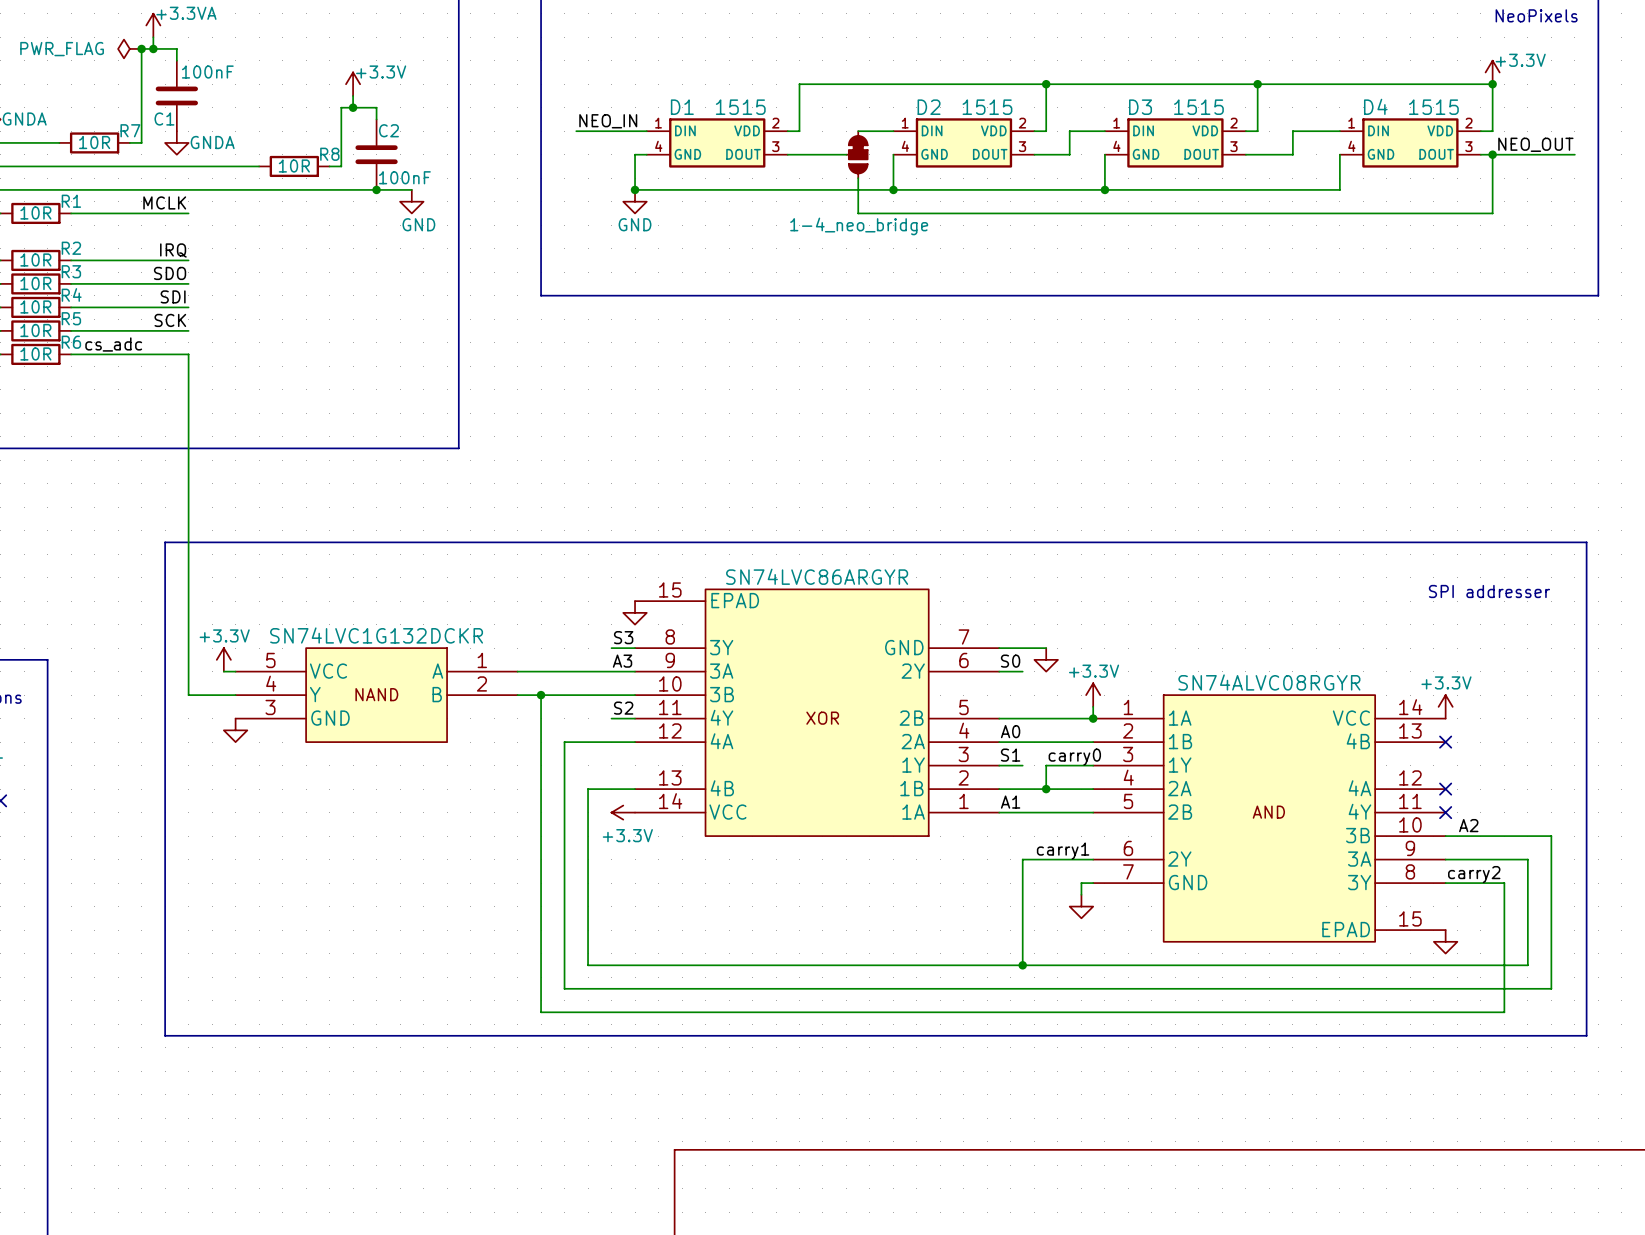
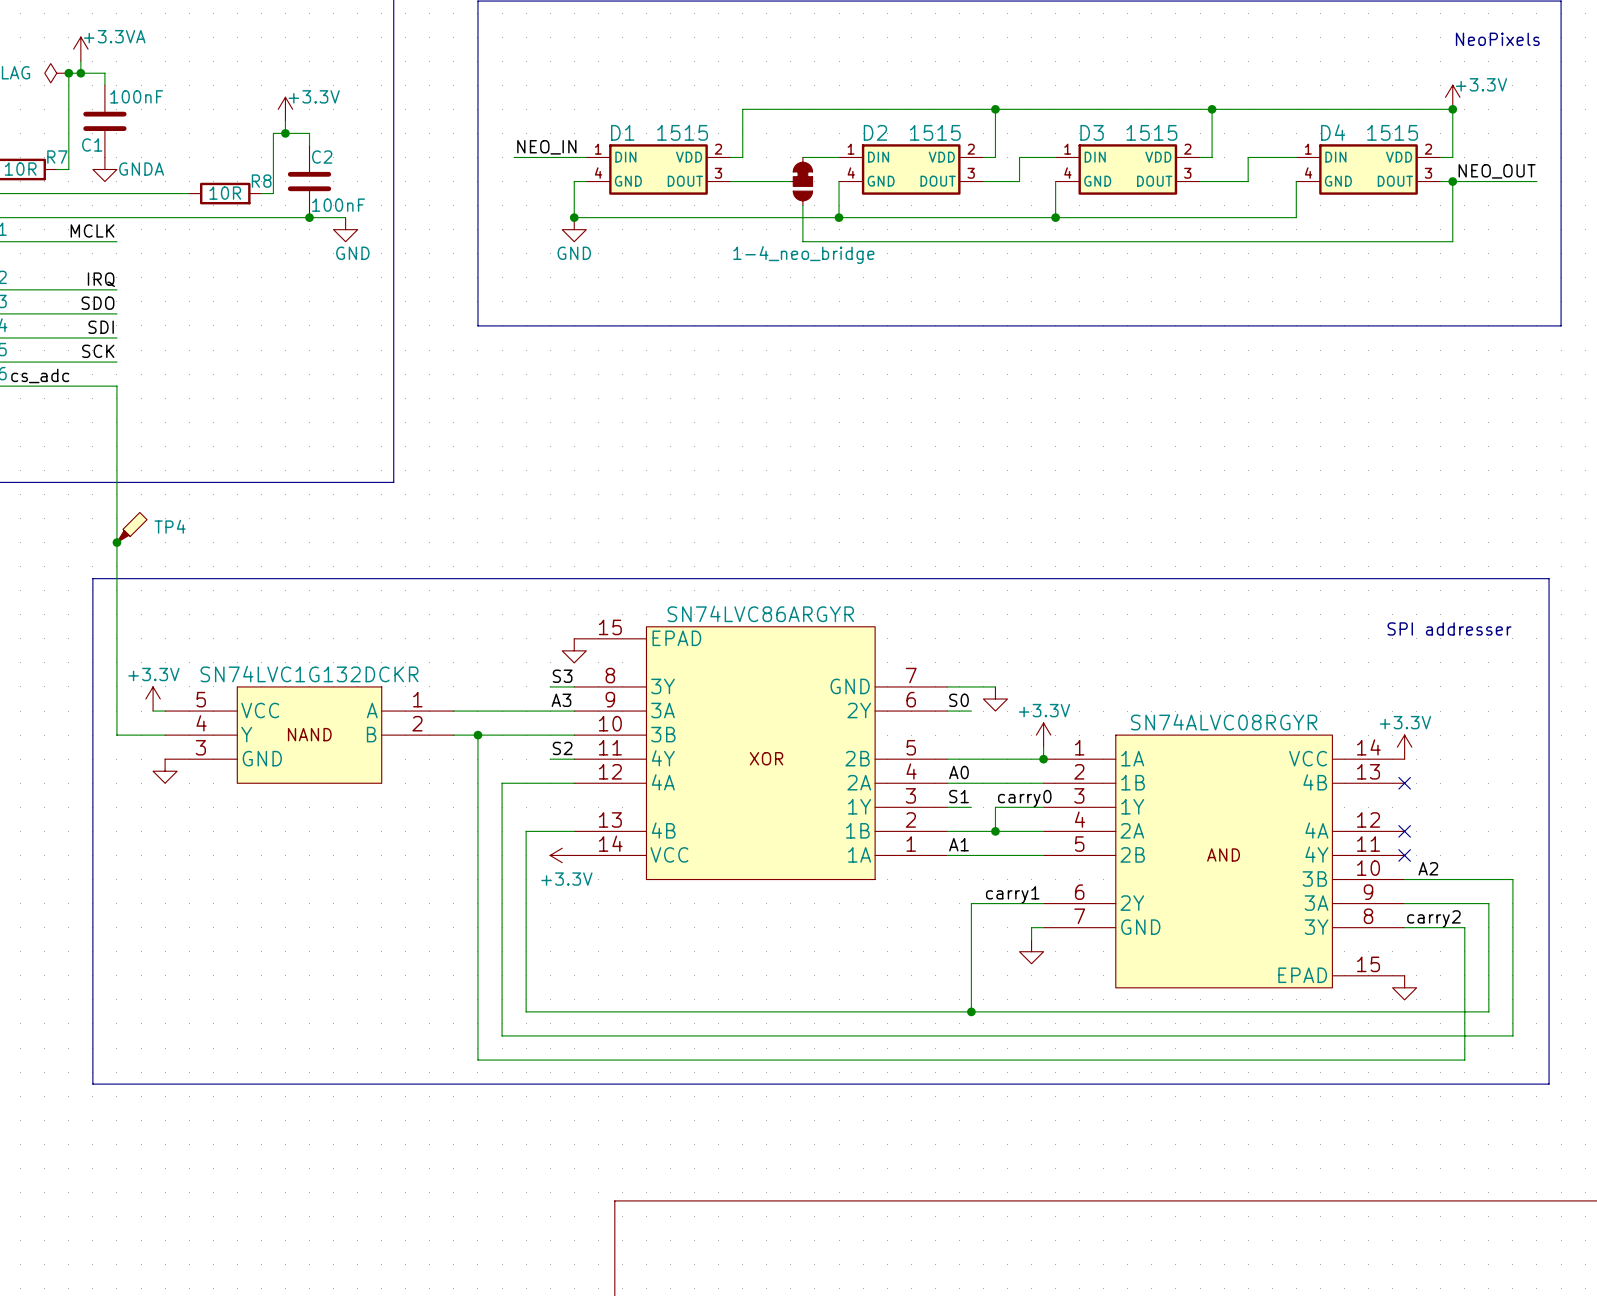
TP4: none -> (132, 527)
junction: none -> (116, 542)

